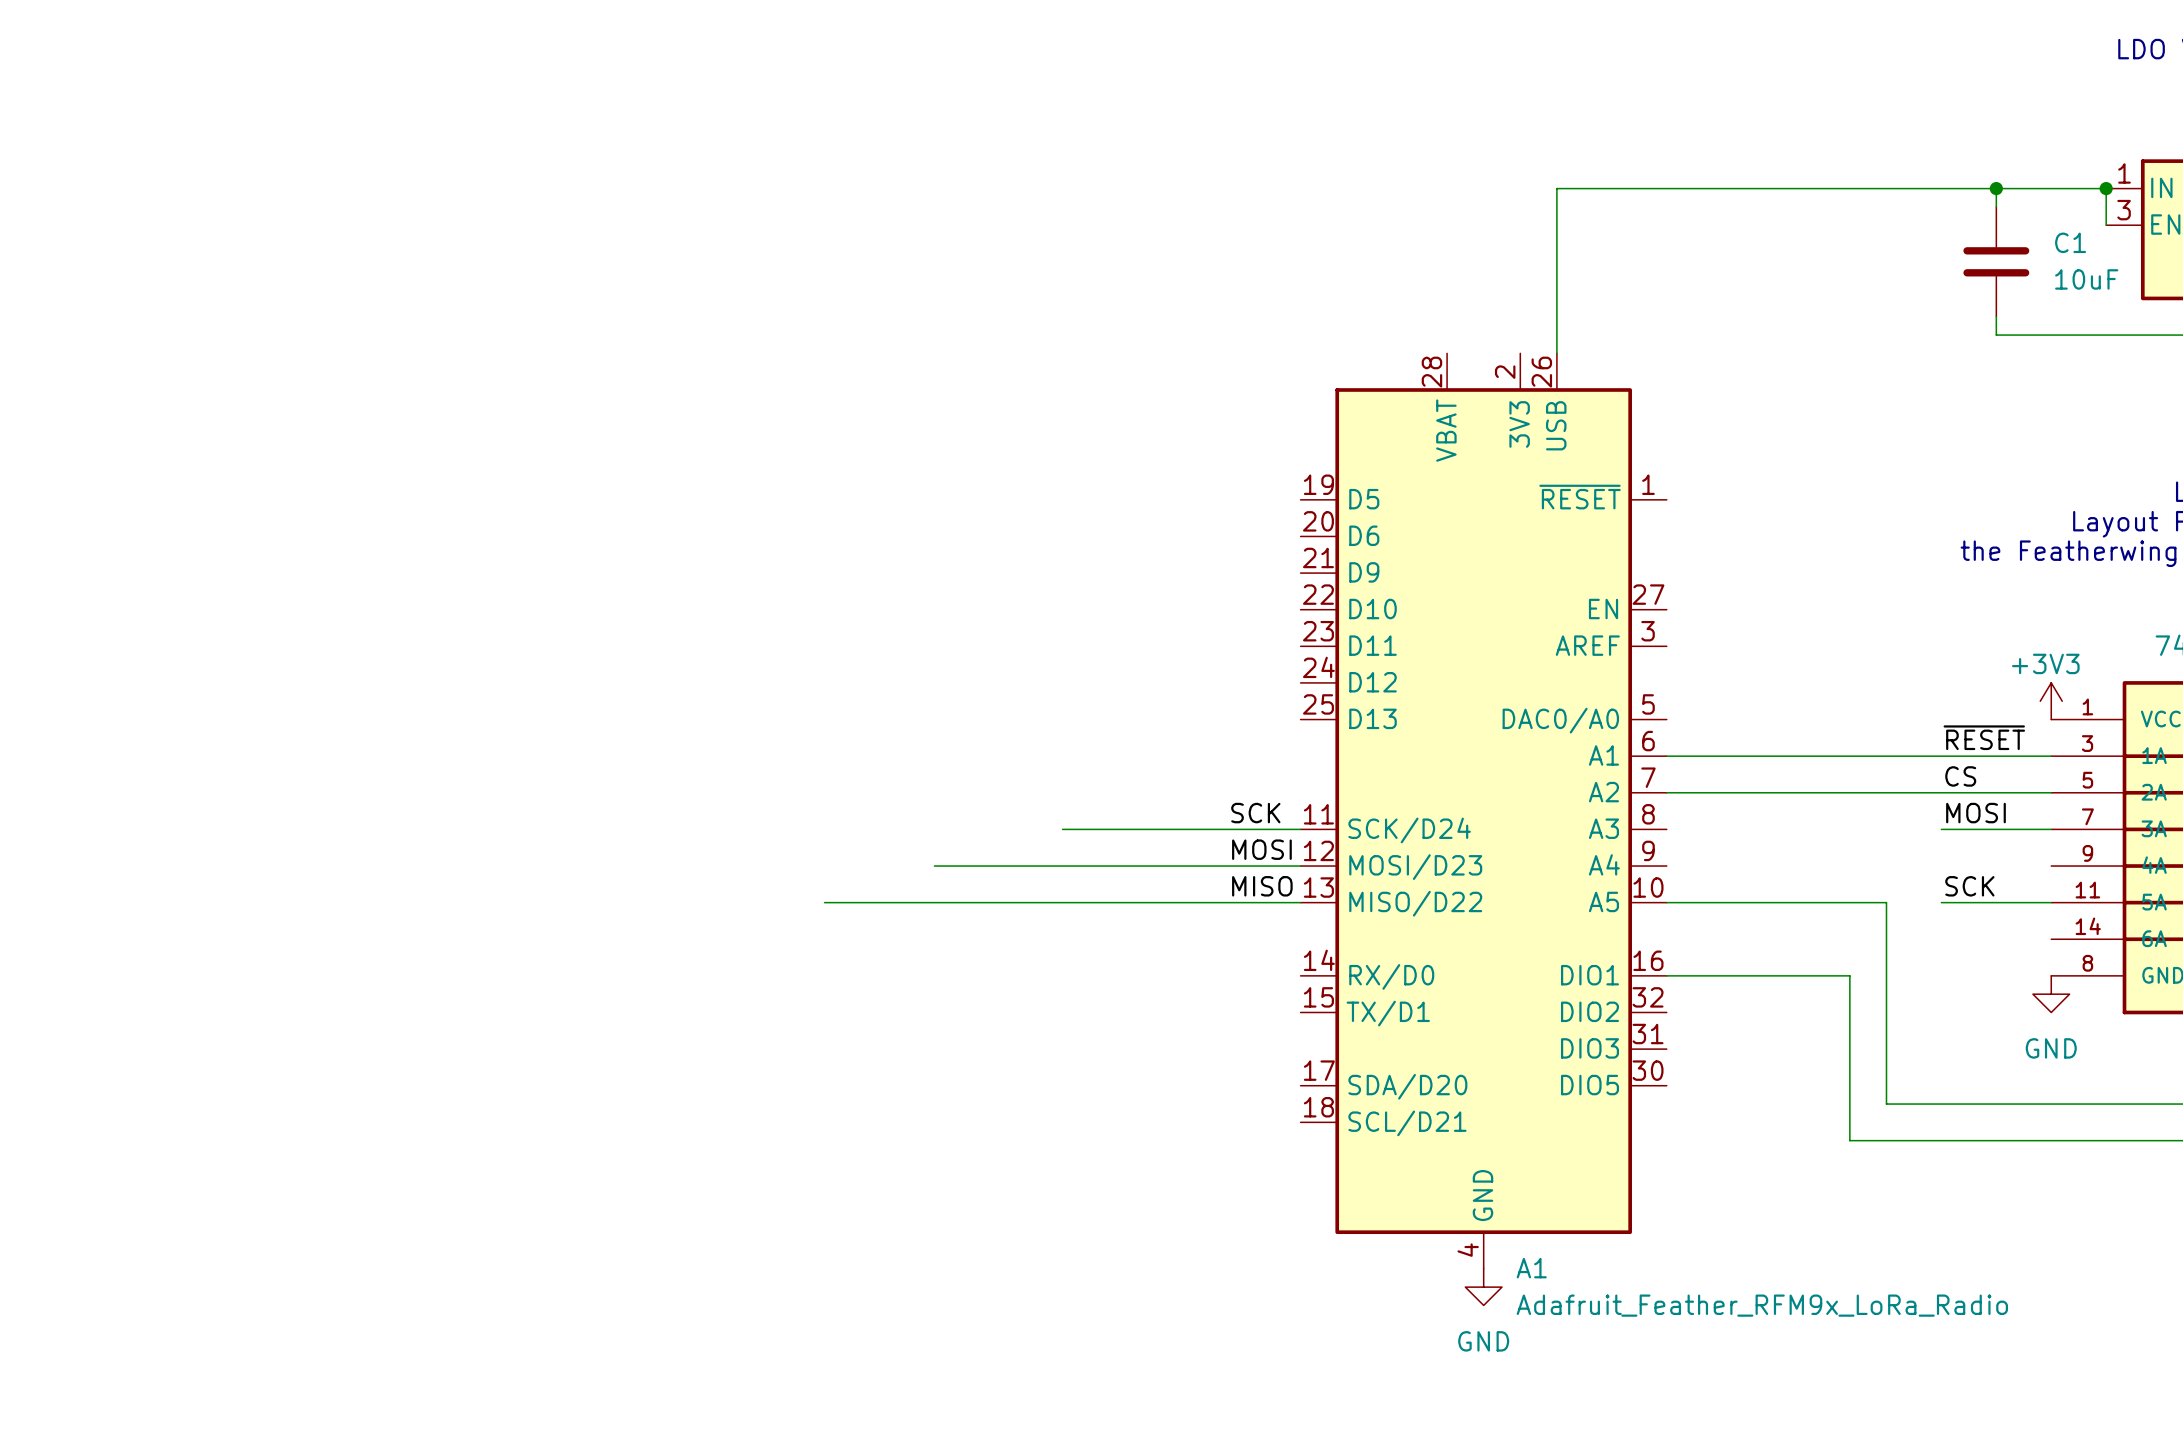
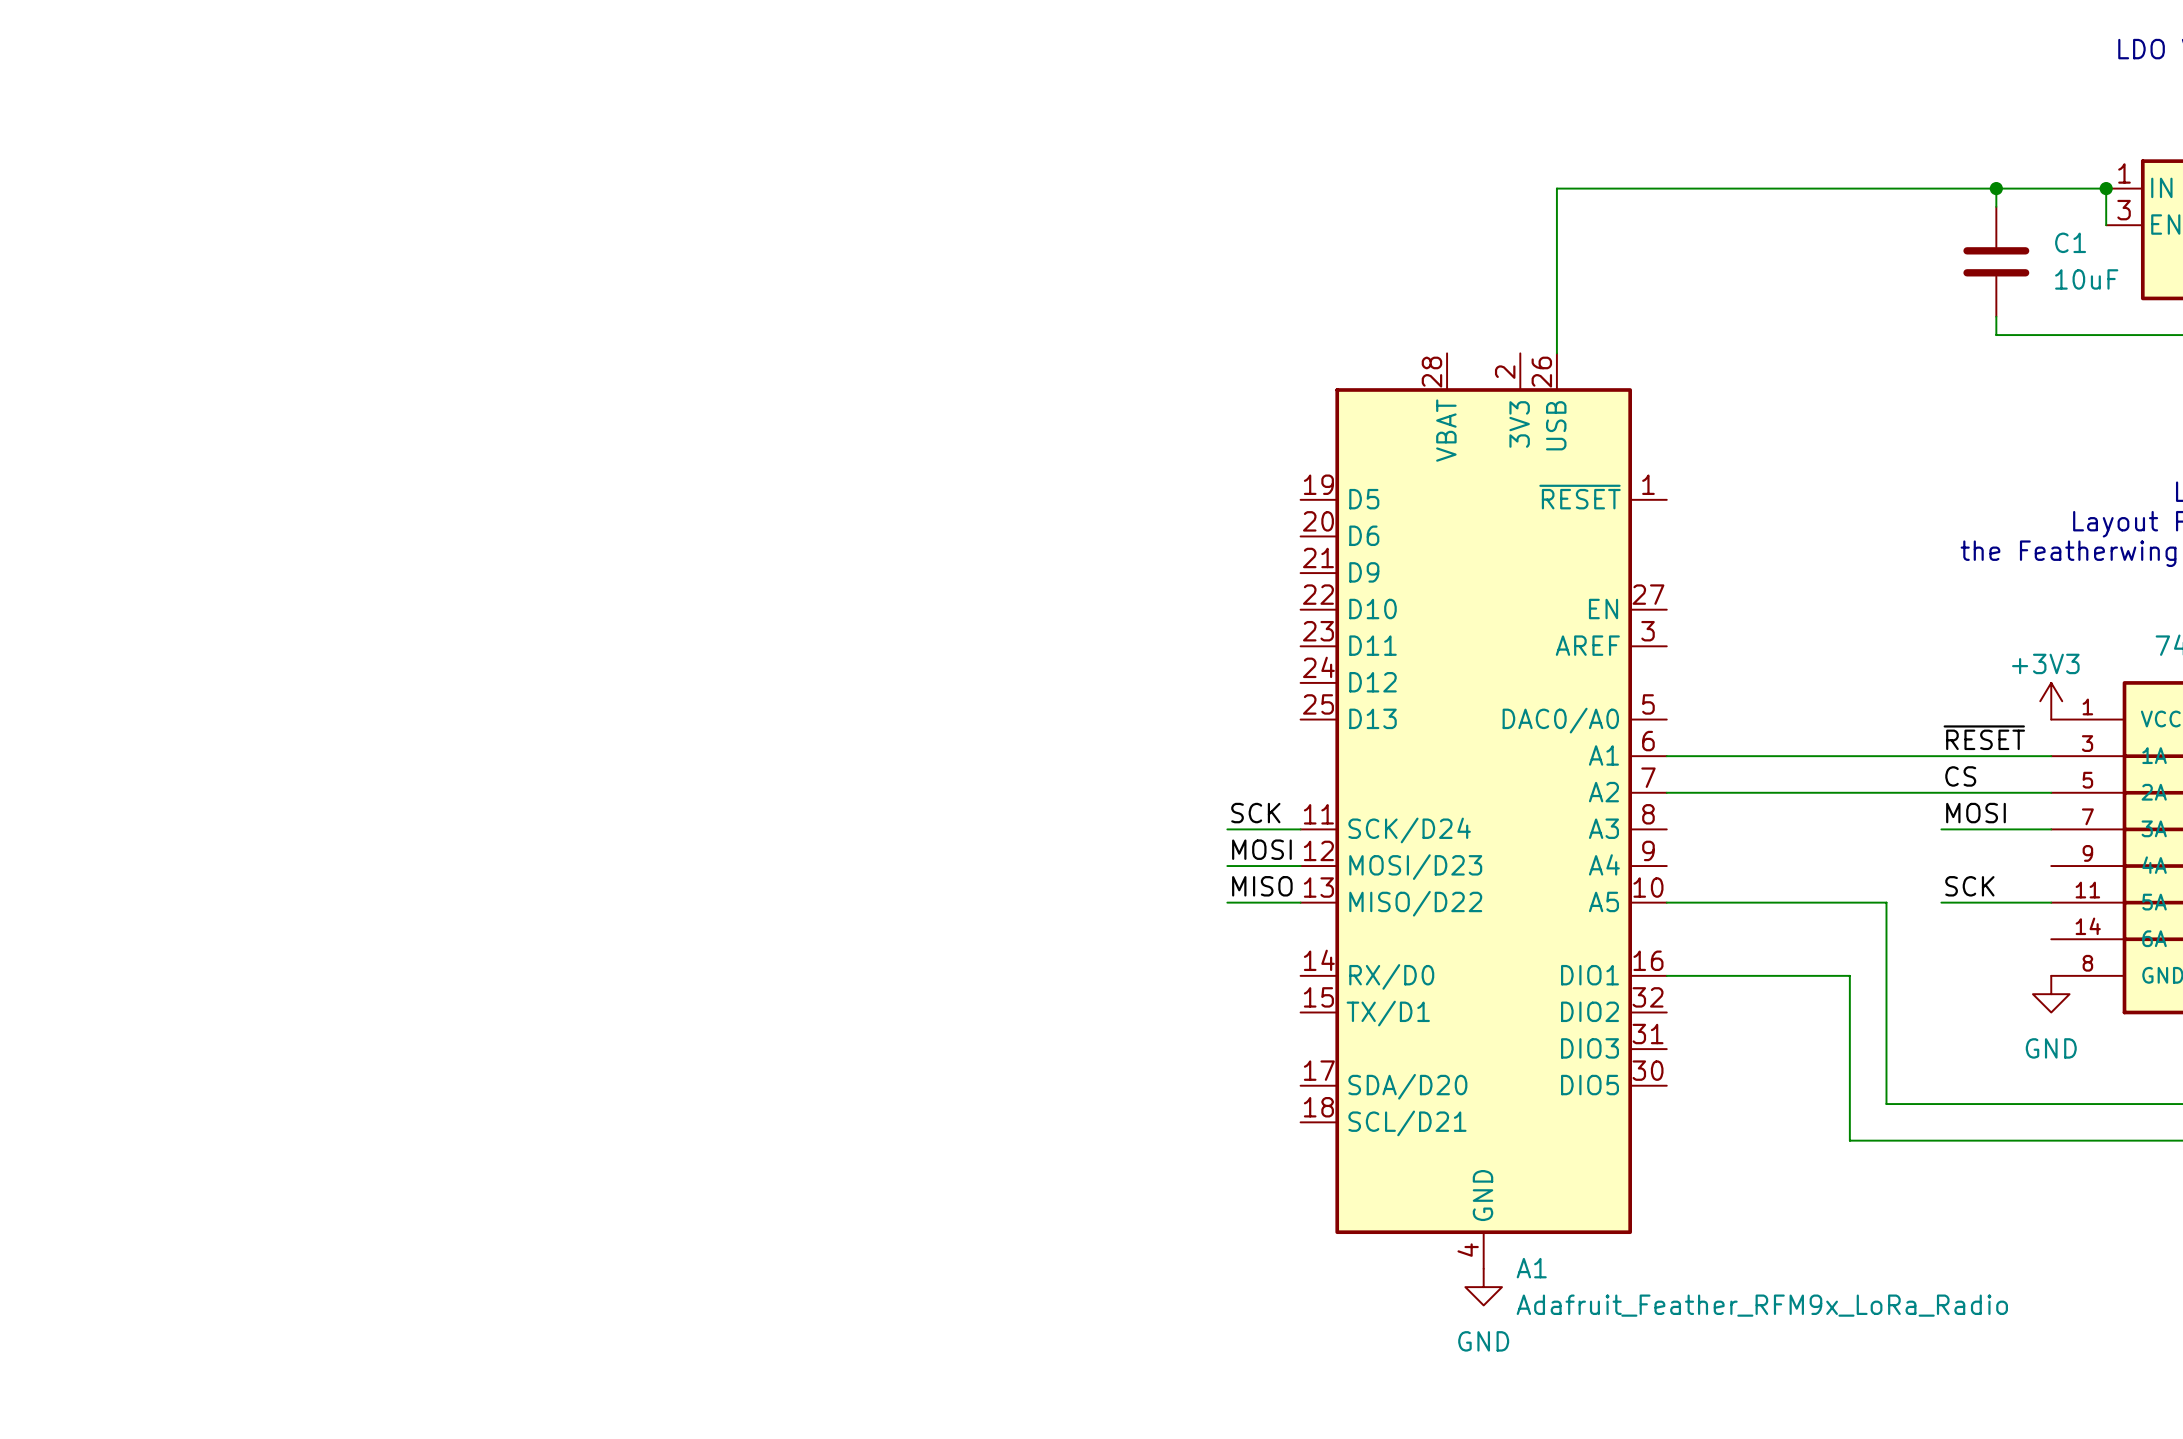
wire: (1062, 829) (1227, 829) -> none
wire: (934, 866) (1227, 866) -> none
wire: (824, 902) (1227, 902) -> none

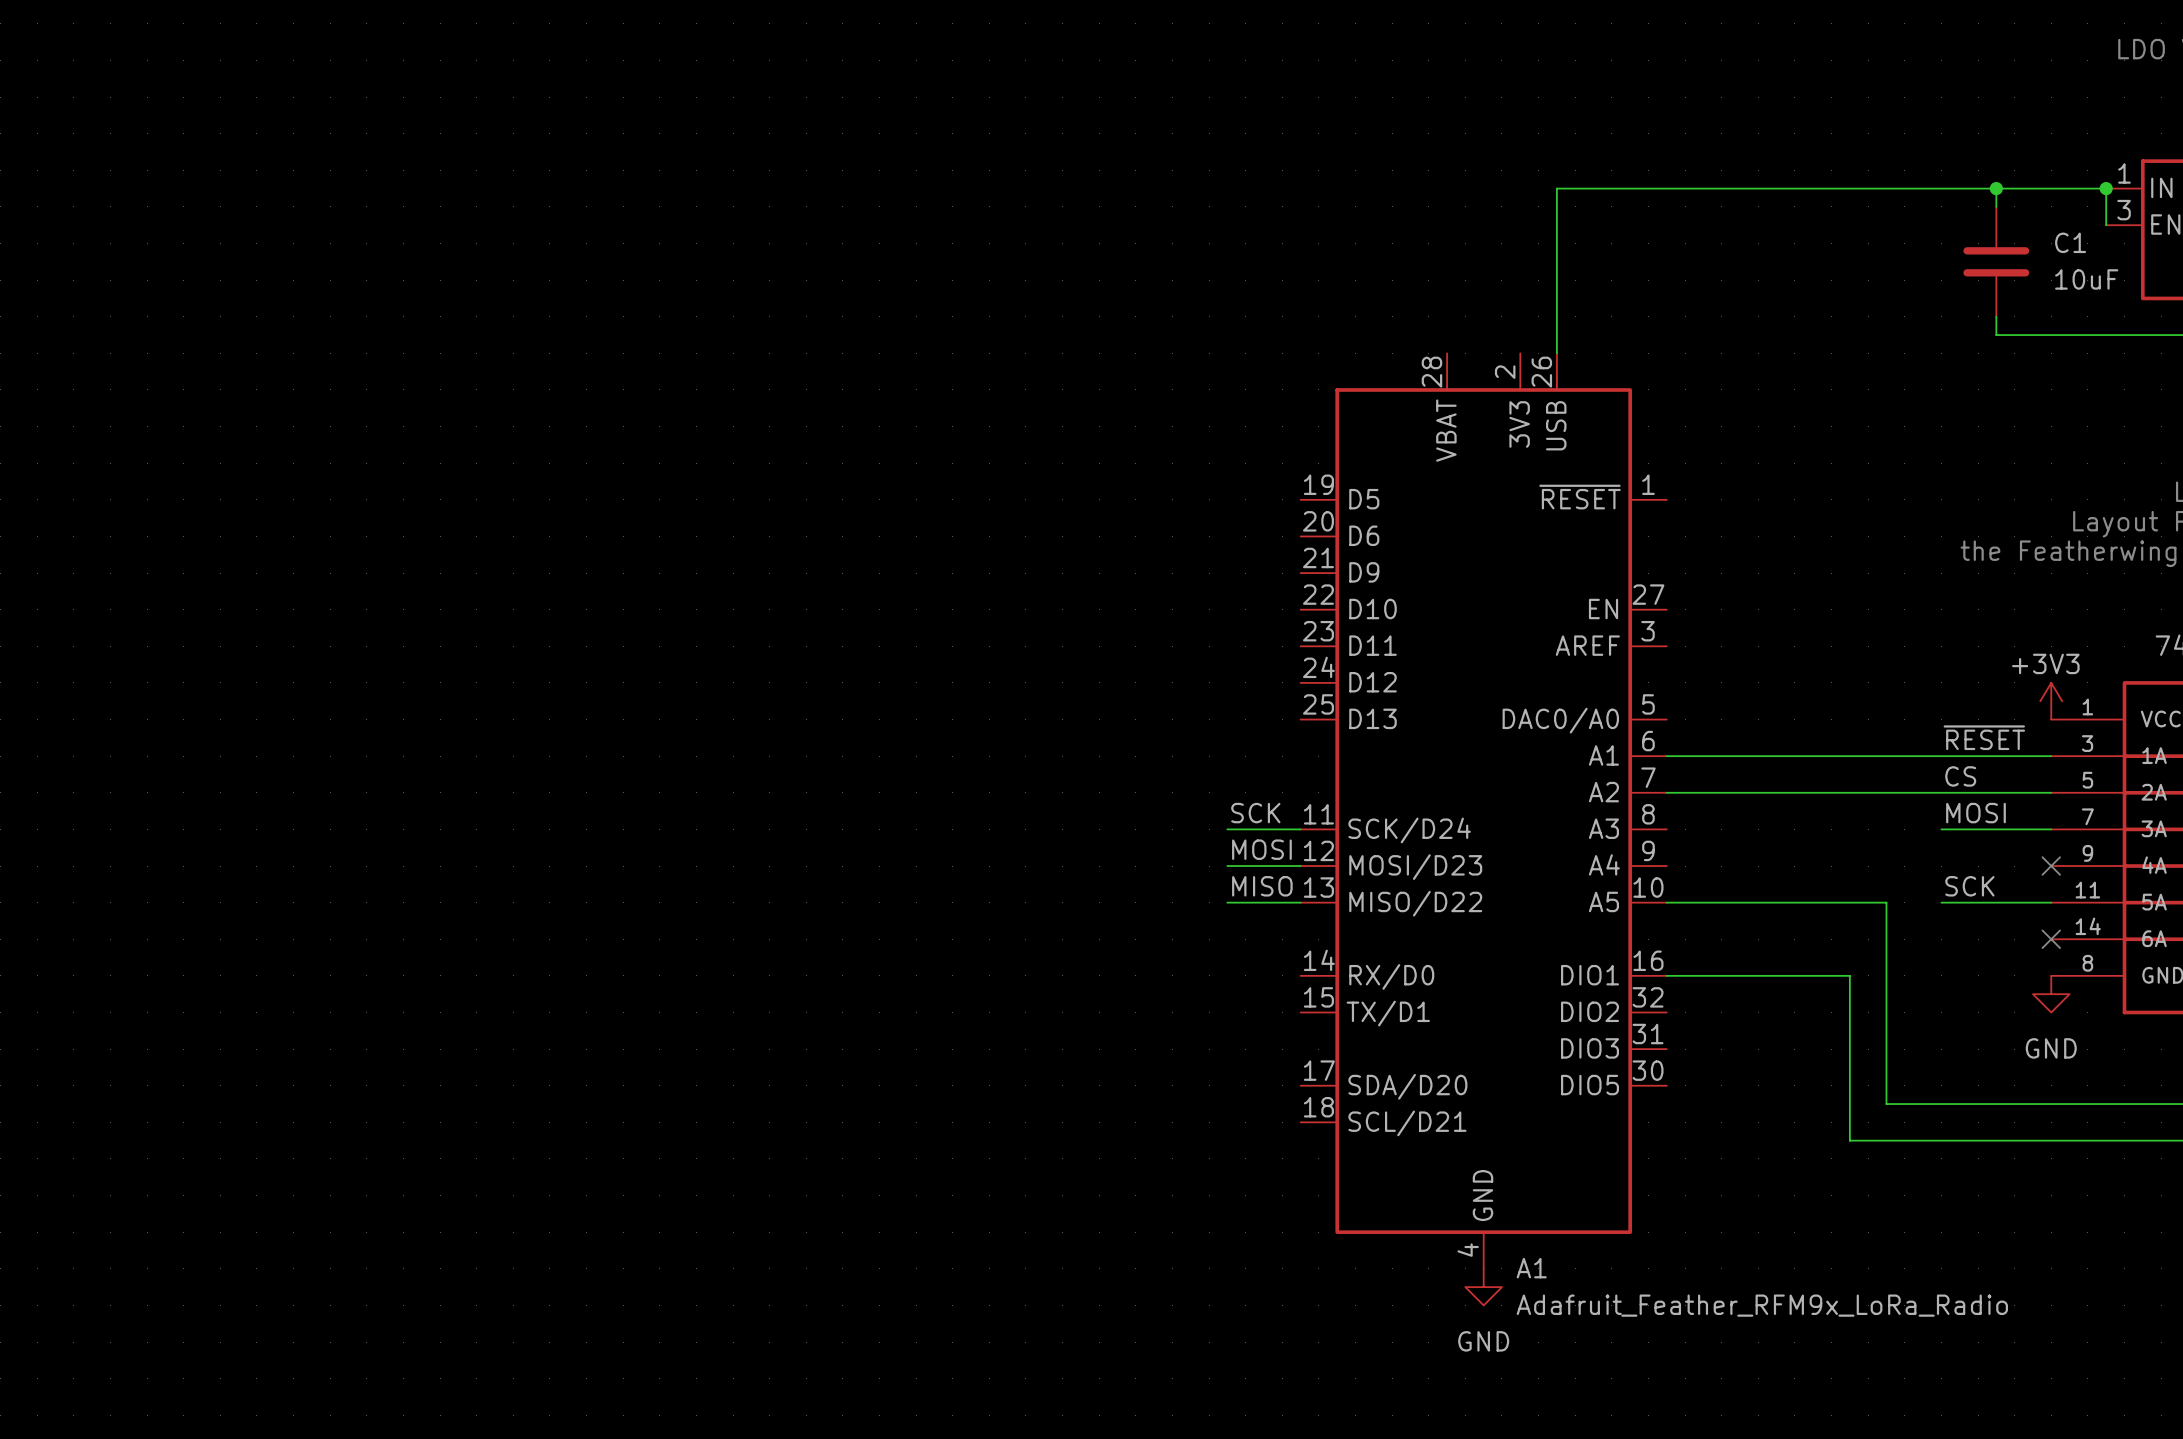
no-connect mark: none -> (2051, 866)
no-connect mark: none -> (2051, 939)

